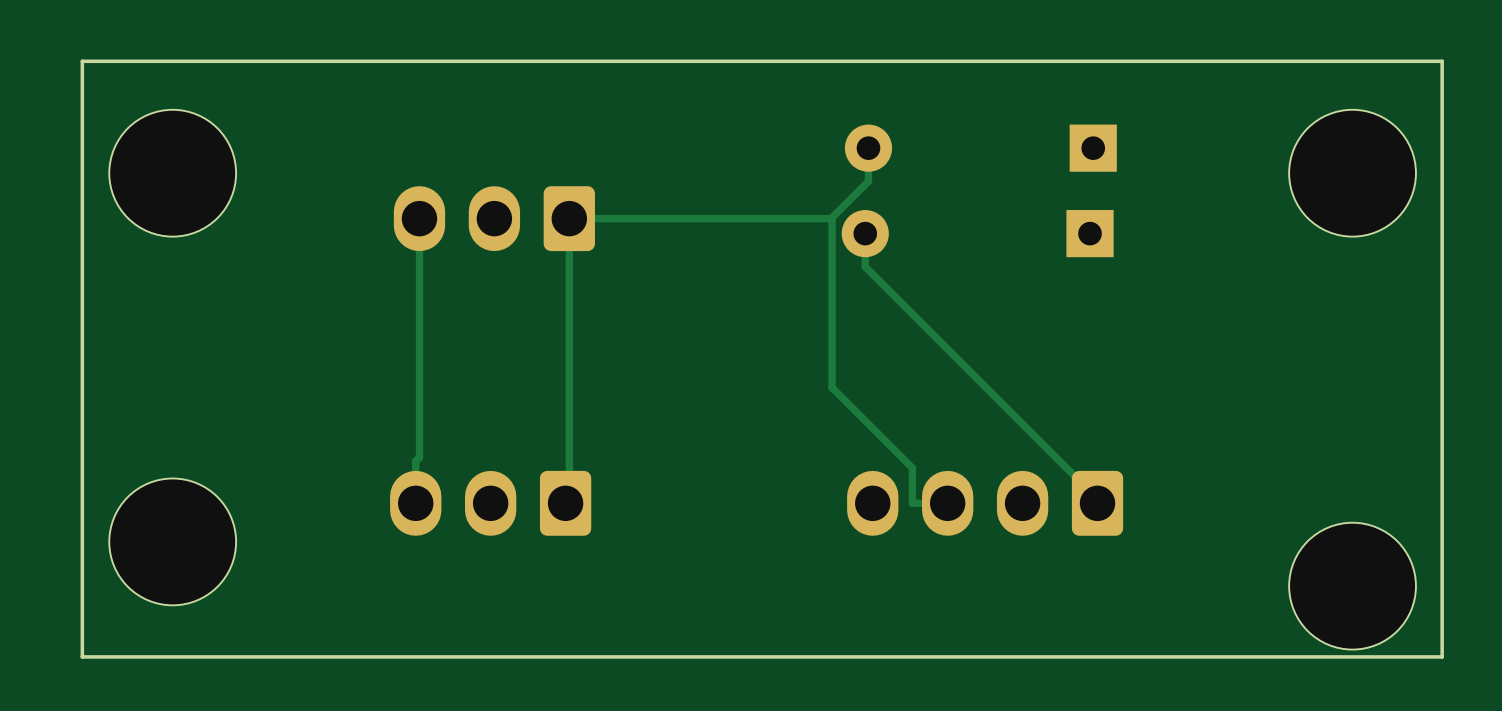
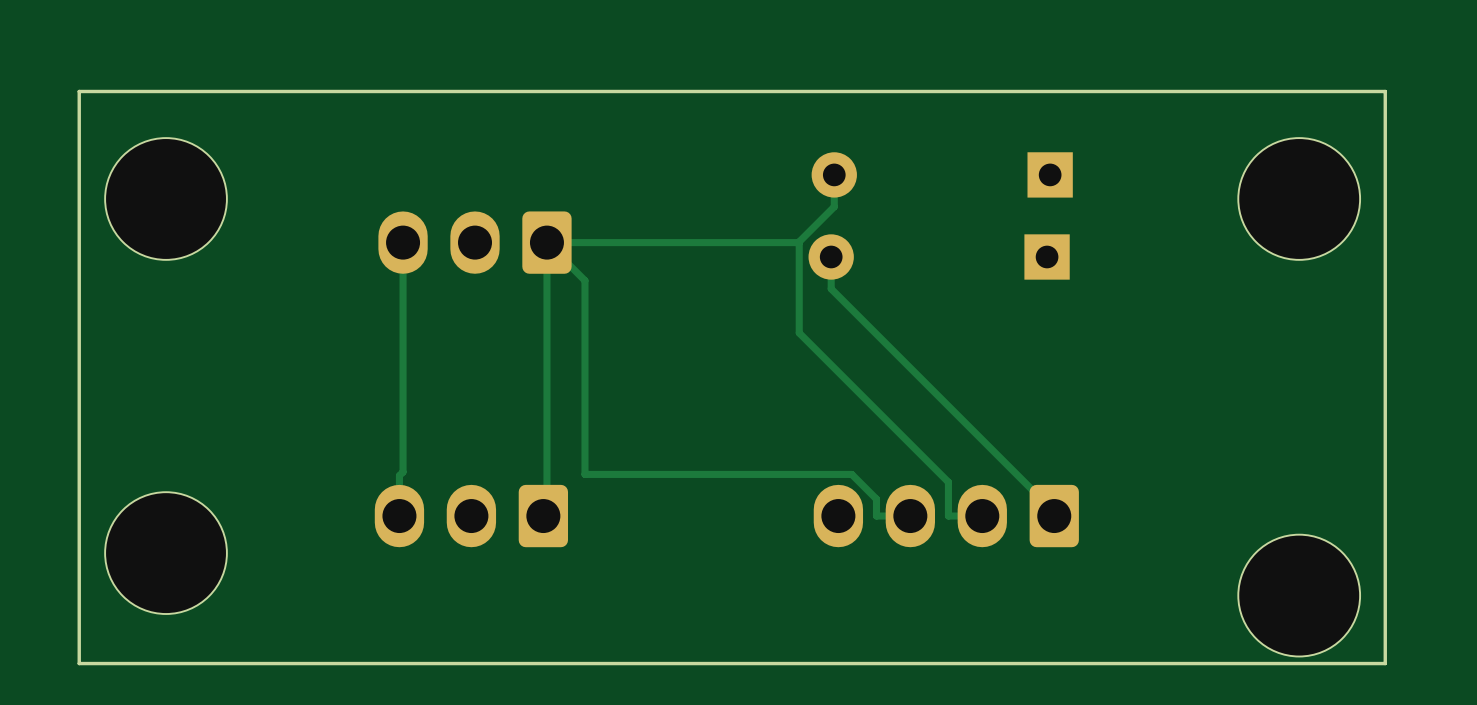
track: none -> (546, 242) (584, 280) (584, 474) (851, 474) (876, 499)
track: (831, 312) (832, 387) (912, 468) (912, 485) -> (799, 332) (948, 482) (948, 516) (982, 516)

